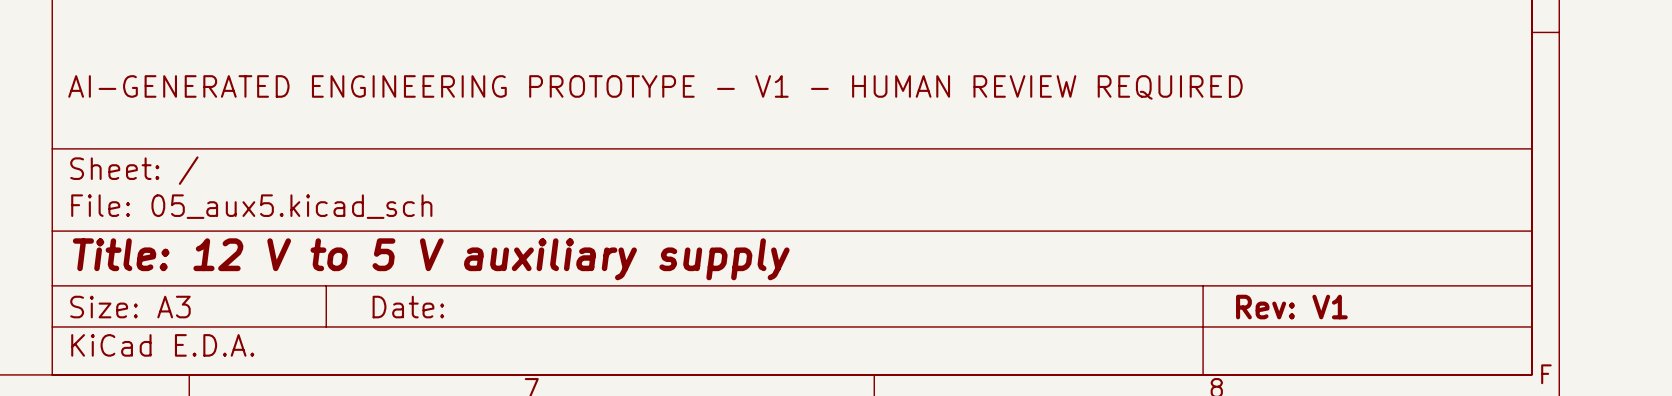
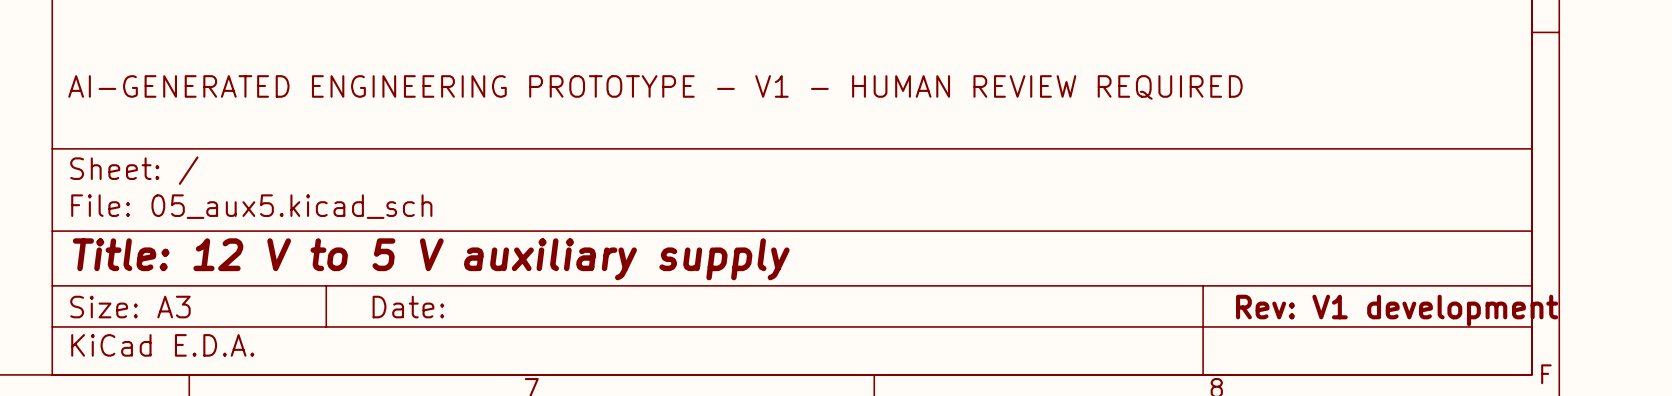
title block: Rev: V1 (1291, 307) -> Rev: V1 development (1397, 310)

